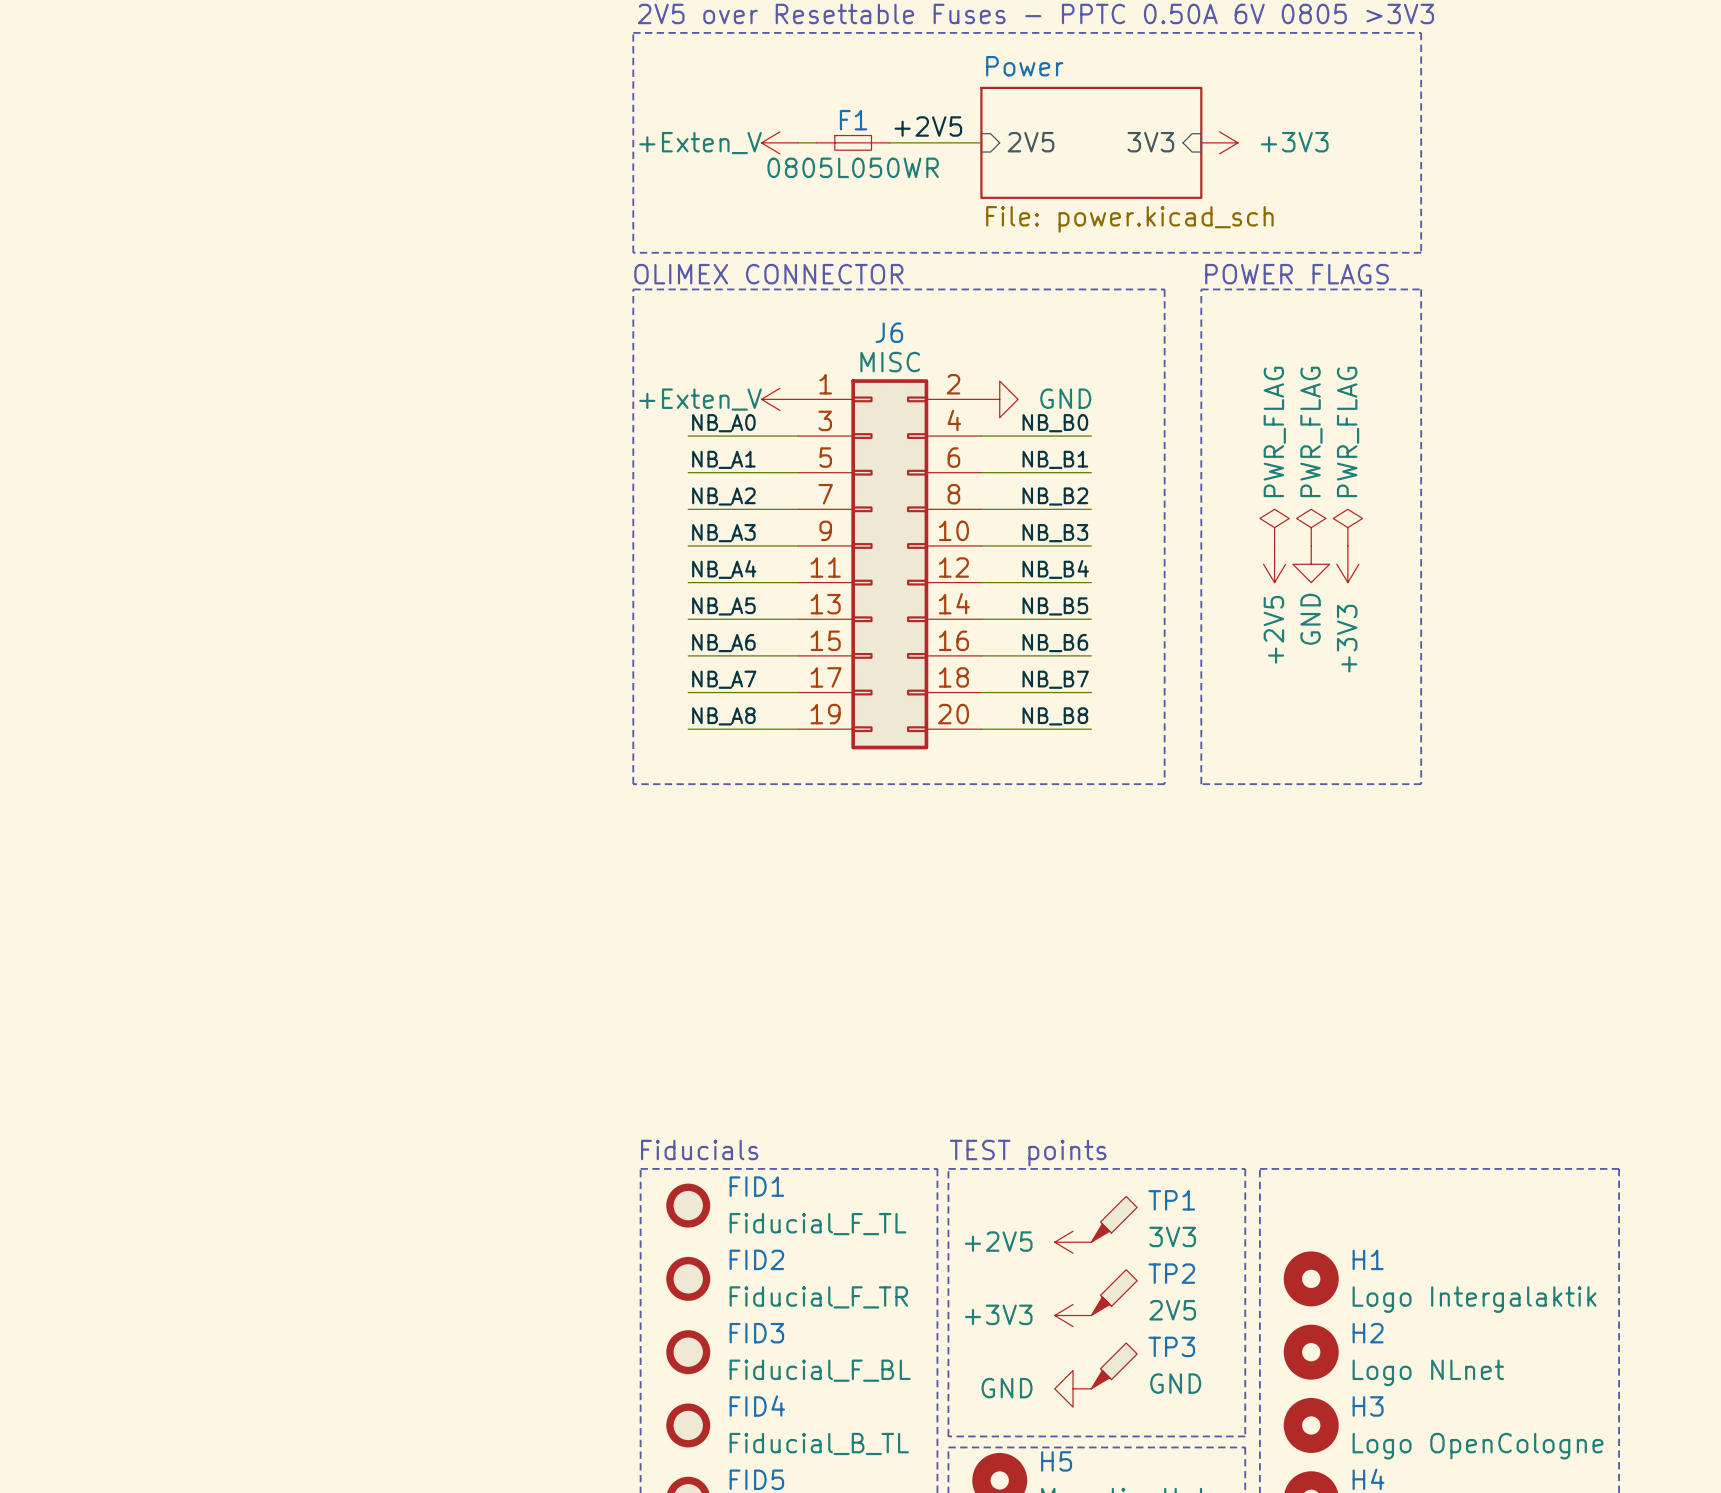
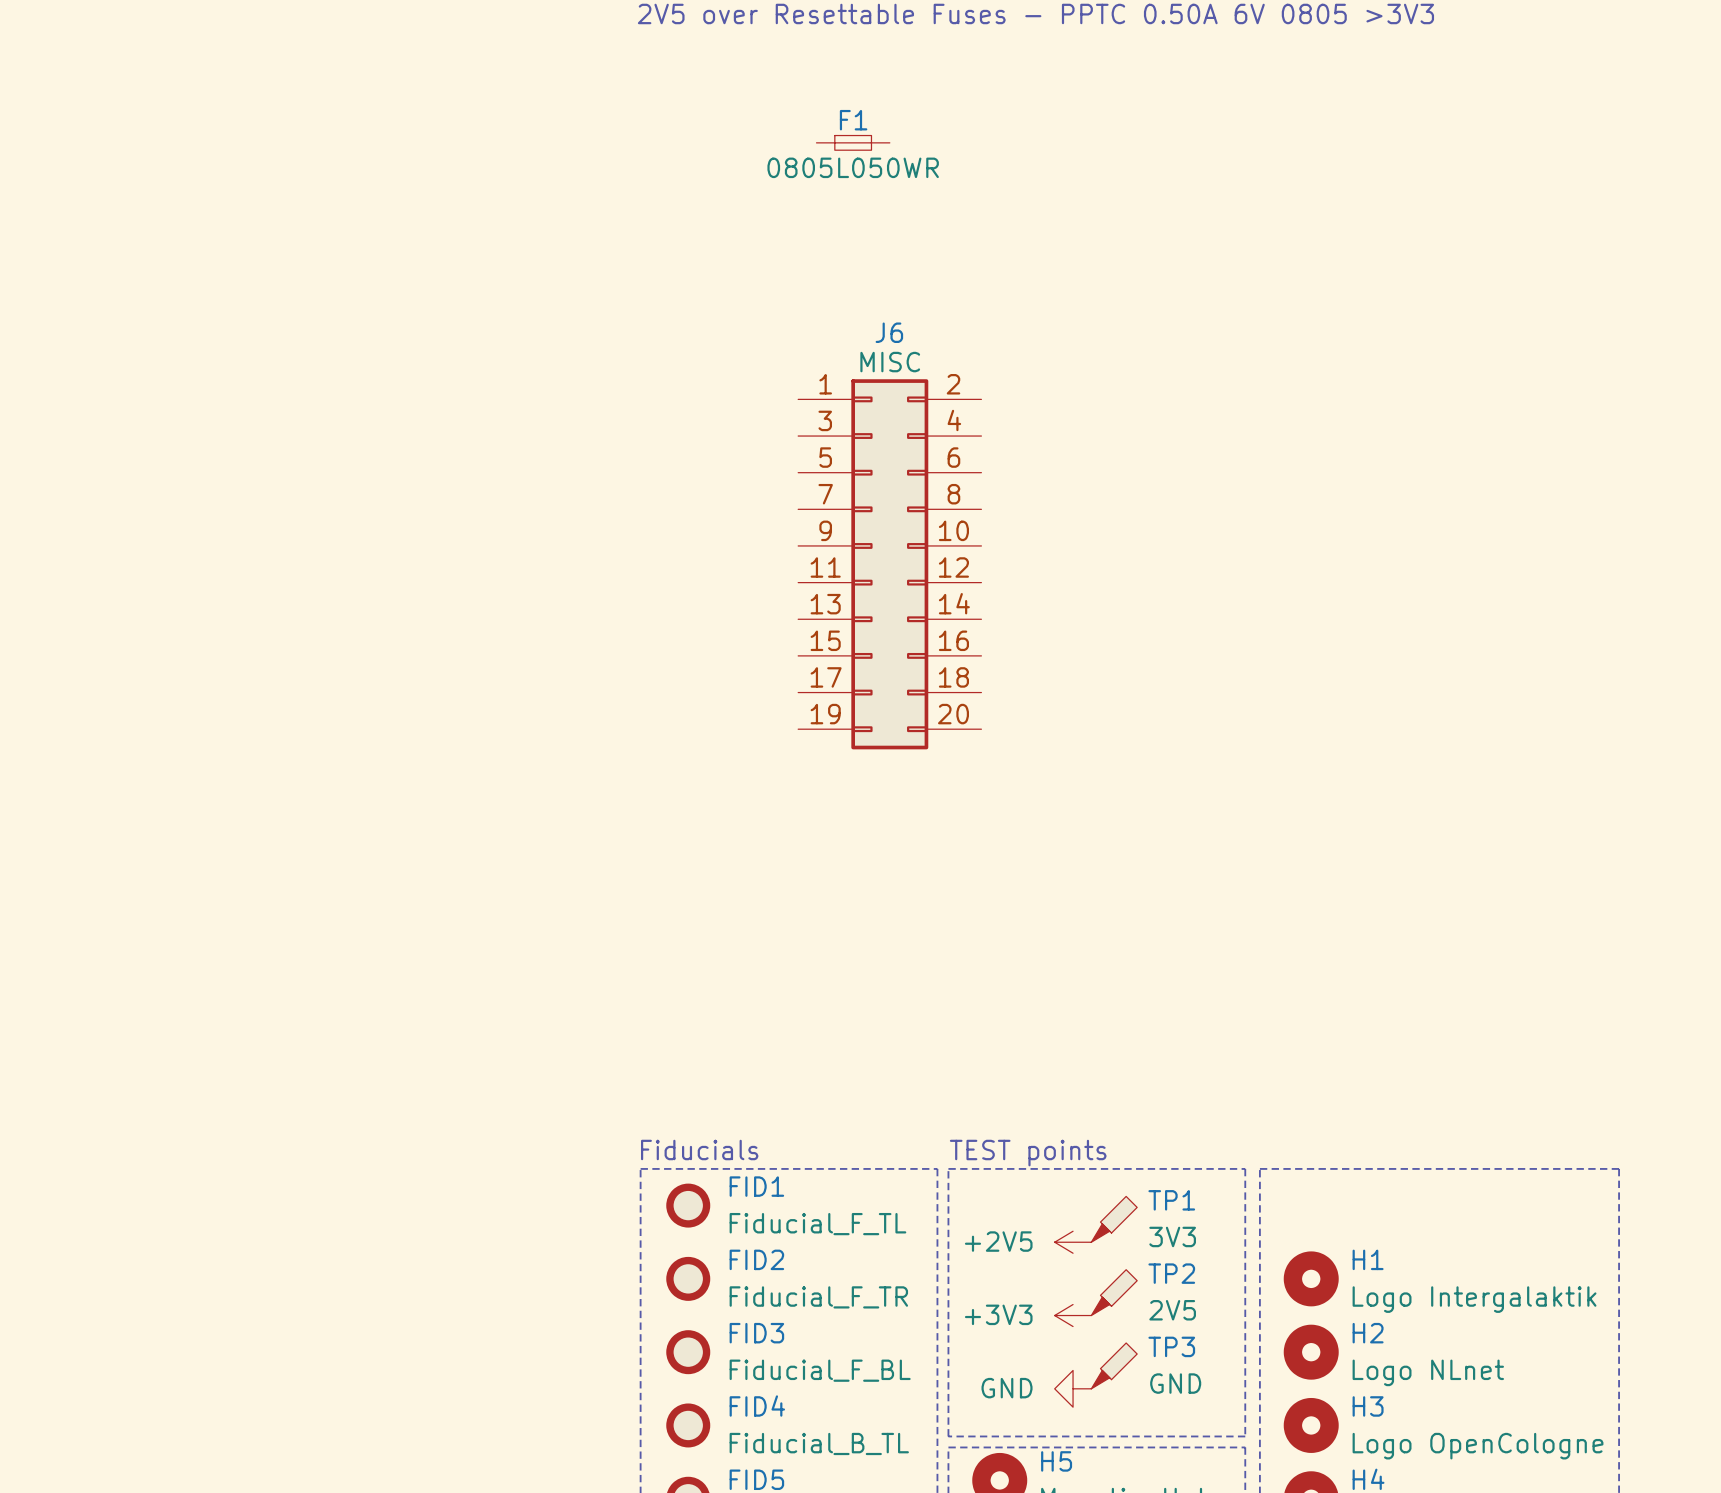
line: (633, 32) (1421, 32) (1421, 252) (633, 252) (633, 32) -> none
label: +2V5 (928, 126) -> none
power symbol: +Exten_V (779, 142) -> none
wire: (798, 142) (816, 142) -> none
wire: (889, 142) (981, 142) -> none
sheet pin: 2V5 (1031, 142) -> none
sheet Power: File: power.kicad_sch (1091, 142) -> none
sheet pin: 3V3 (1150, 142) -> none
power symbol: +3V3 (1219, 142) -> none
text: OLIMEX CONNECTOR (768, 274) -> none
text: POWER FLAGS (1297, 274) -> none
line: (633, 289) (633, 784) (1164, 784) (1164, 289) (633, 289) -> none
line: (1201, 289) (1421, 289) (1421, 784) (1201, 784) (1201, 289) -> none
power symbol: +Exten_V (779, 399) -> none
power symbol: GND (999, 399) -> none
label: NB_A0 (723, 423) -> none
label: NB_B0 (1055, 423) -> none
wire: (688, 436) (798, 436) -> none
wire: (981, 436) (1091, 436) -> none
label: NB_A1 (723, 459) -> none
label: NB_B1 (1055, 459) -> none
wire: (688, 472) (798, 472) -> none
wire: (981, 472) (1091, 472) -> none
label: NB_A2 (723, 496) -> none
label: NB_B2 (1055, 496) -> none
wire: (688, 509) (798, 509) -> none
wire: (981, 509) (1091, 509) -> none
power symbol: PWR_FLAG (1274, 527) -> none
power symbol: PWR_FLAG (1311, 527) -> none
power symbol: PWR_FLAG (1347, 527) -> none
label: NB_A3 (723, 533) -> none
label: NB_B3 (1055, 533) -> none
wire: (688, 545) (798, 545) -> none
wire: (981, 545) (1091, 545) -> none
power symbol: +2V5 (1274, 564) -> none
power symbol: GND (1311, 564) -> none
power symbol: +3V3 (1347, 564) -> none
label: NB_A4 (724, 569) -> none
label: NB_B4 (1055, 569) -> none
wire: (688, 582) (798, 582) -> none
wire: (981, 582) (1091, 582) -> none
label: NB_A5 (723, 606) -> none
label: NB_B5 (1055, 606) -> none
wire: (688, 619) (798, 619) -> none
wire: (981, 619) (1091, 619) -> none
label: NB_A6 (723, 643) -> none
label: NB_B6 (1055, 643) -> none
wire: (688, 655) (798, 655) -> none
wire: (981, 655) (1091, 655) -> none
label: NB_A7 (724, 679) -> none
label: NB_B7 (1055, 679) -> none
wire: (688, 692) (798, 692) -> none
wire: (981, 692) (1091, 692) -> none
label: NB_A8 (723, 716) -> none
label: NB_B8 (1055, 716) -> none
wire: (688, 729) (798, 729) -> none
wire: (981, 729) (1091, 729) -> none

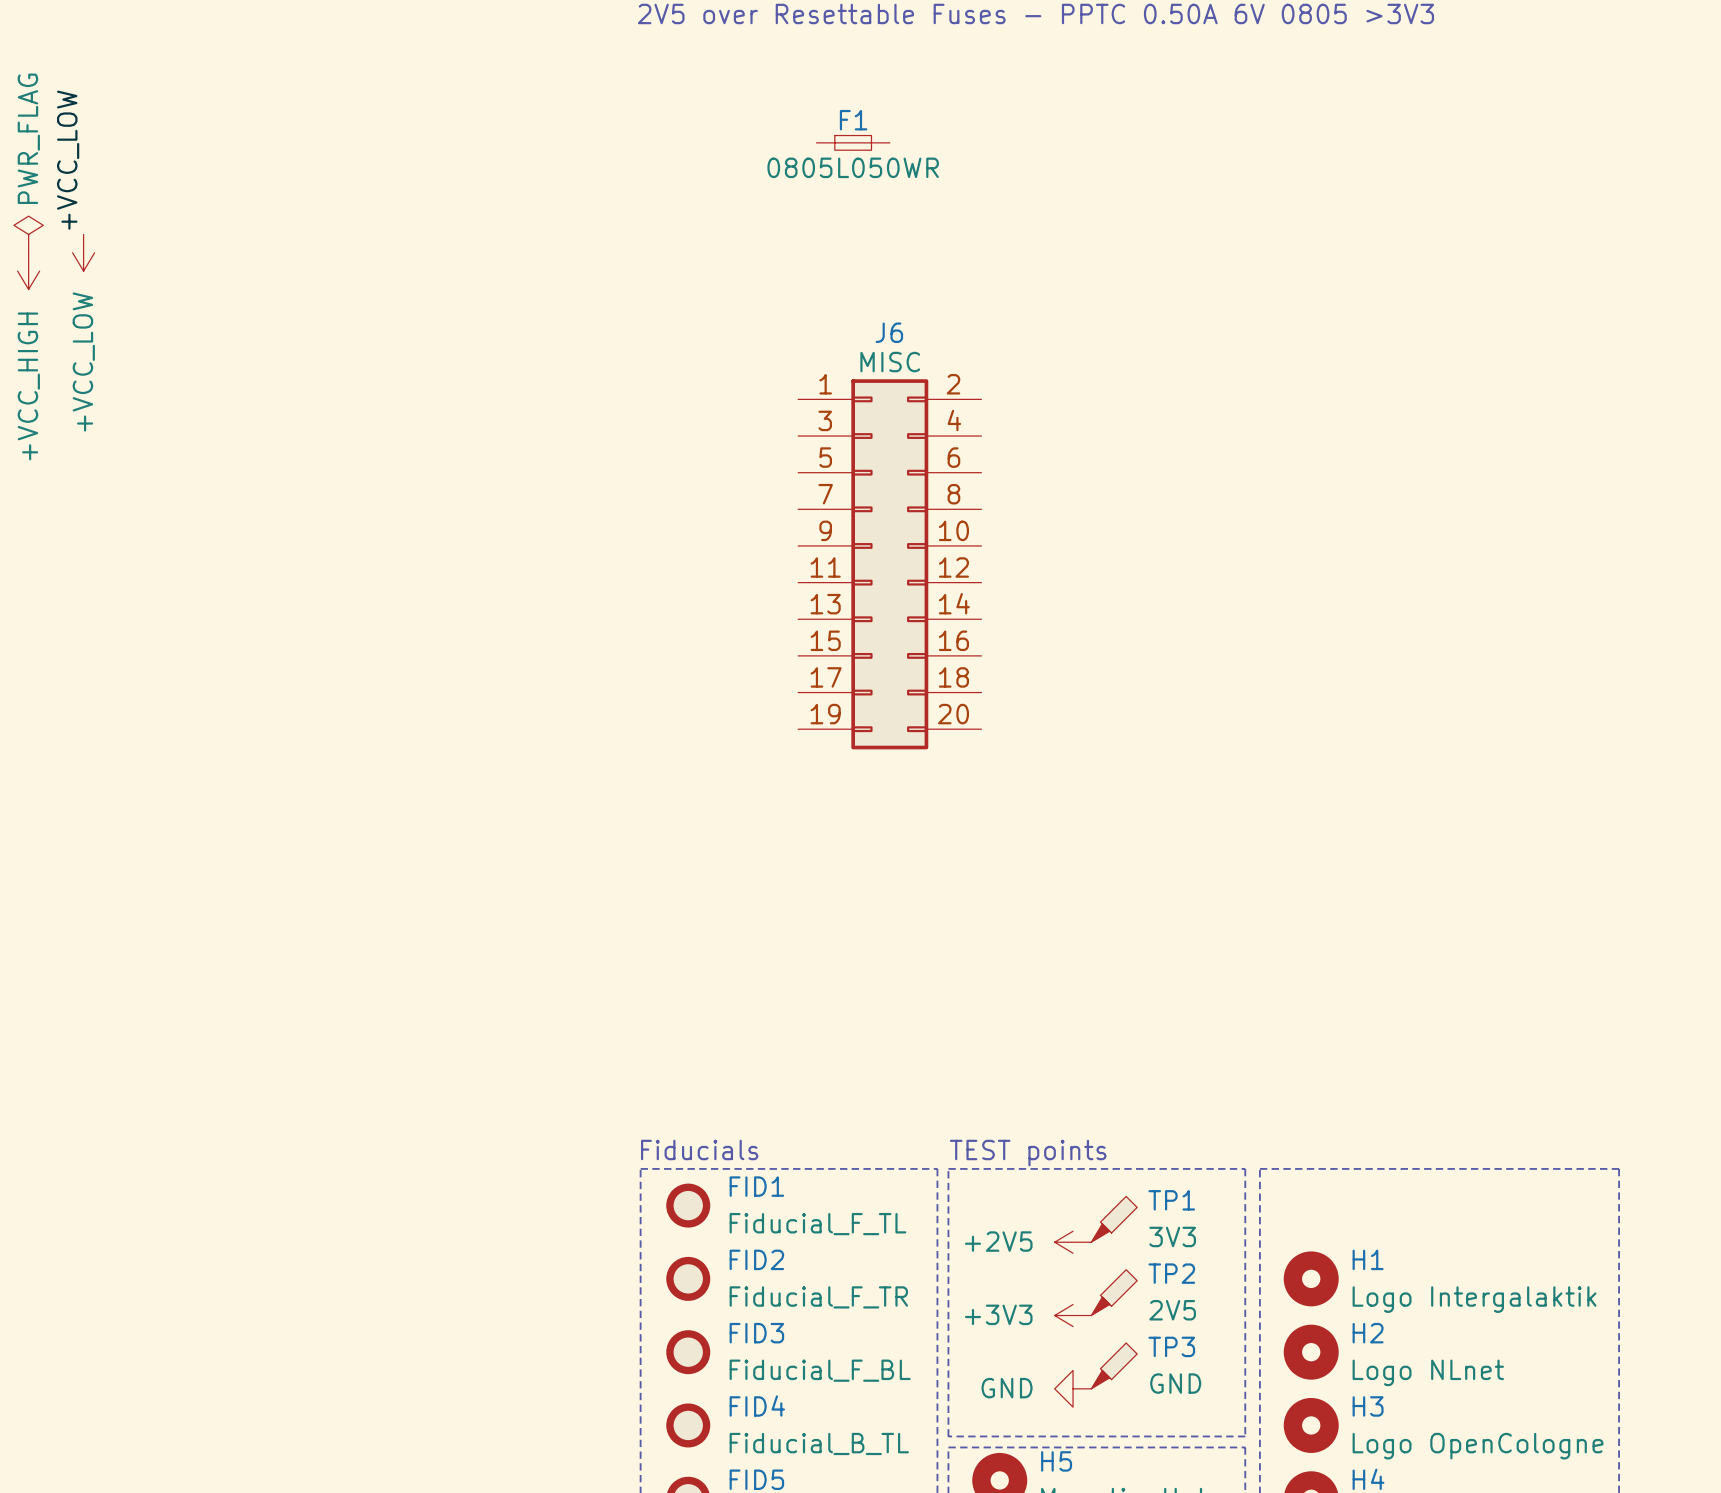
label: none -> +VCC_LOW (68, 160)
power symbol: none -> PWR_FLAG (28, 234)
power symbol: none -> +VCC_LOW (83, 252)
power symbol: none -> +VCC_HIGH (28, 271)

